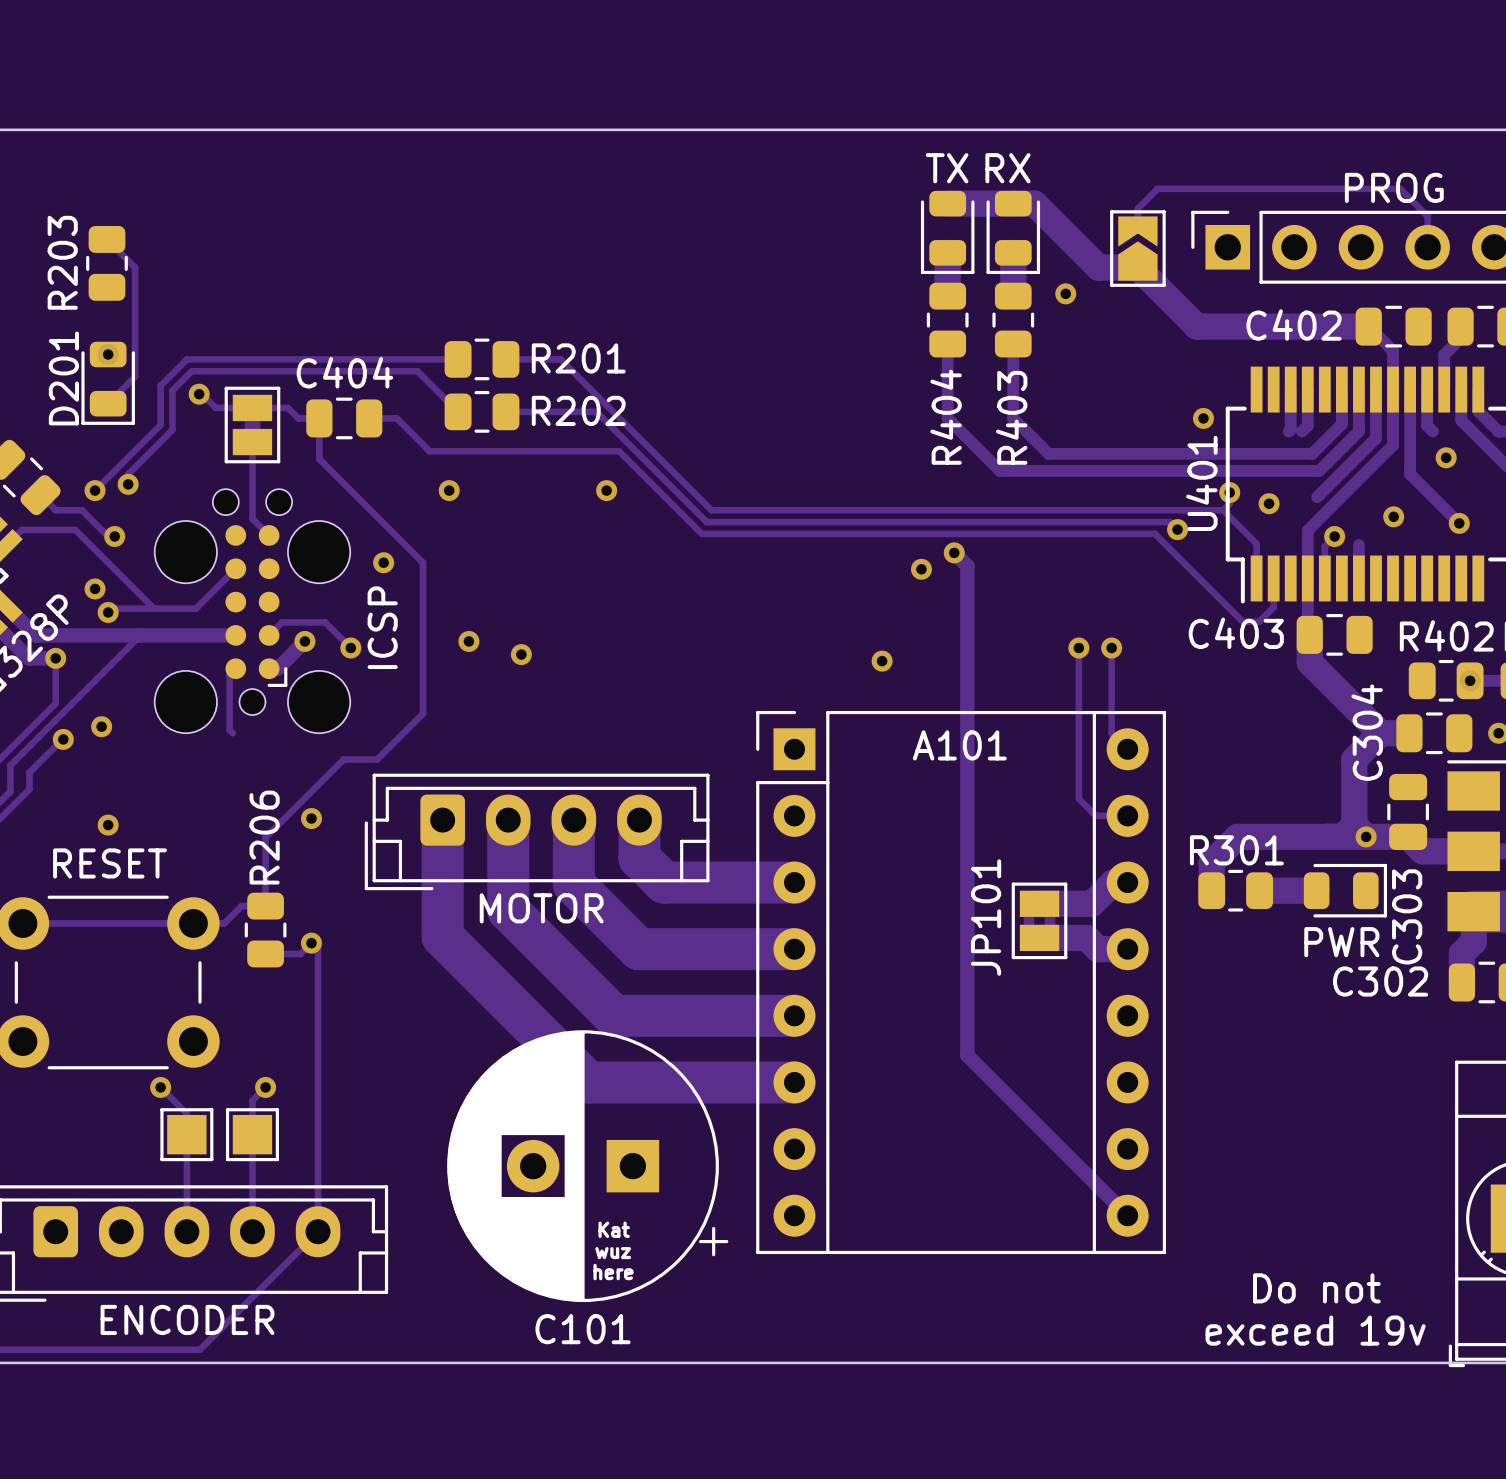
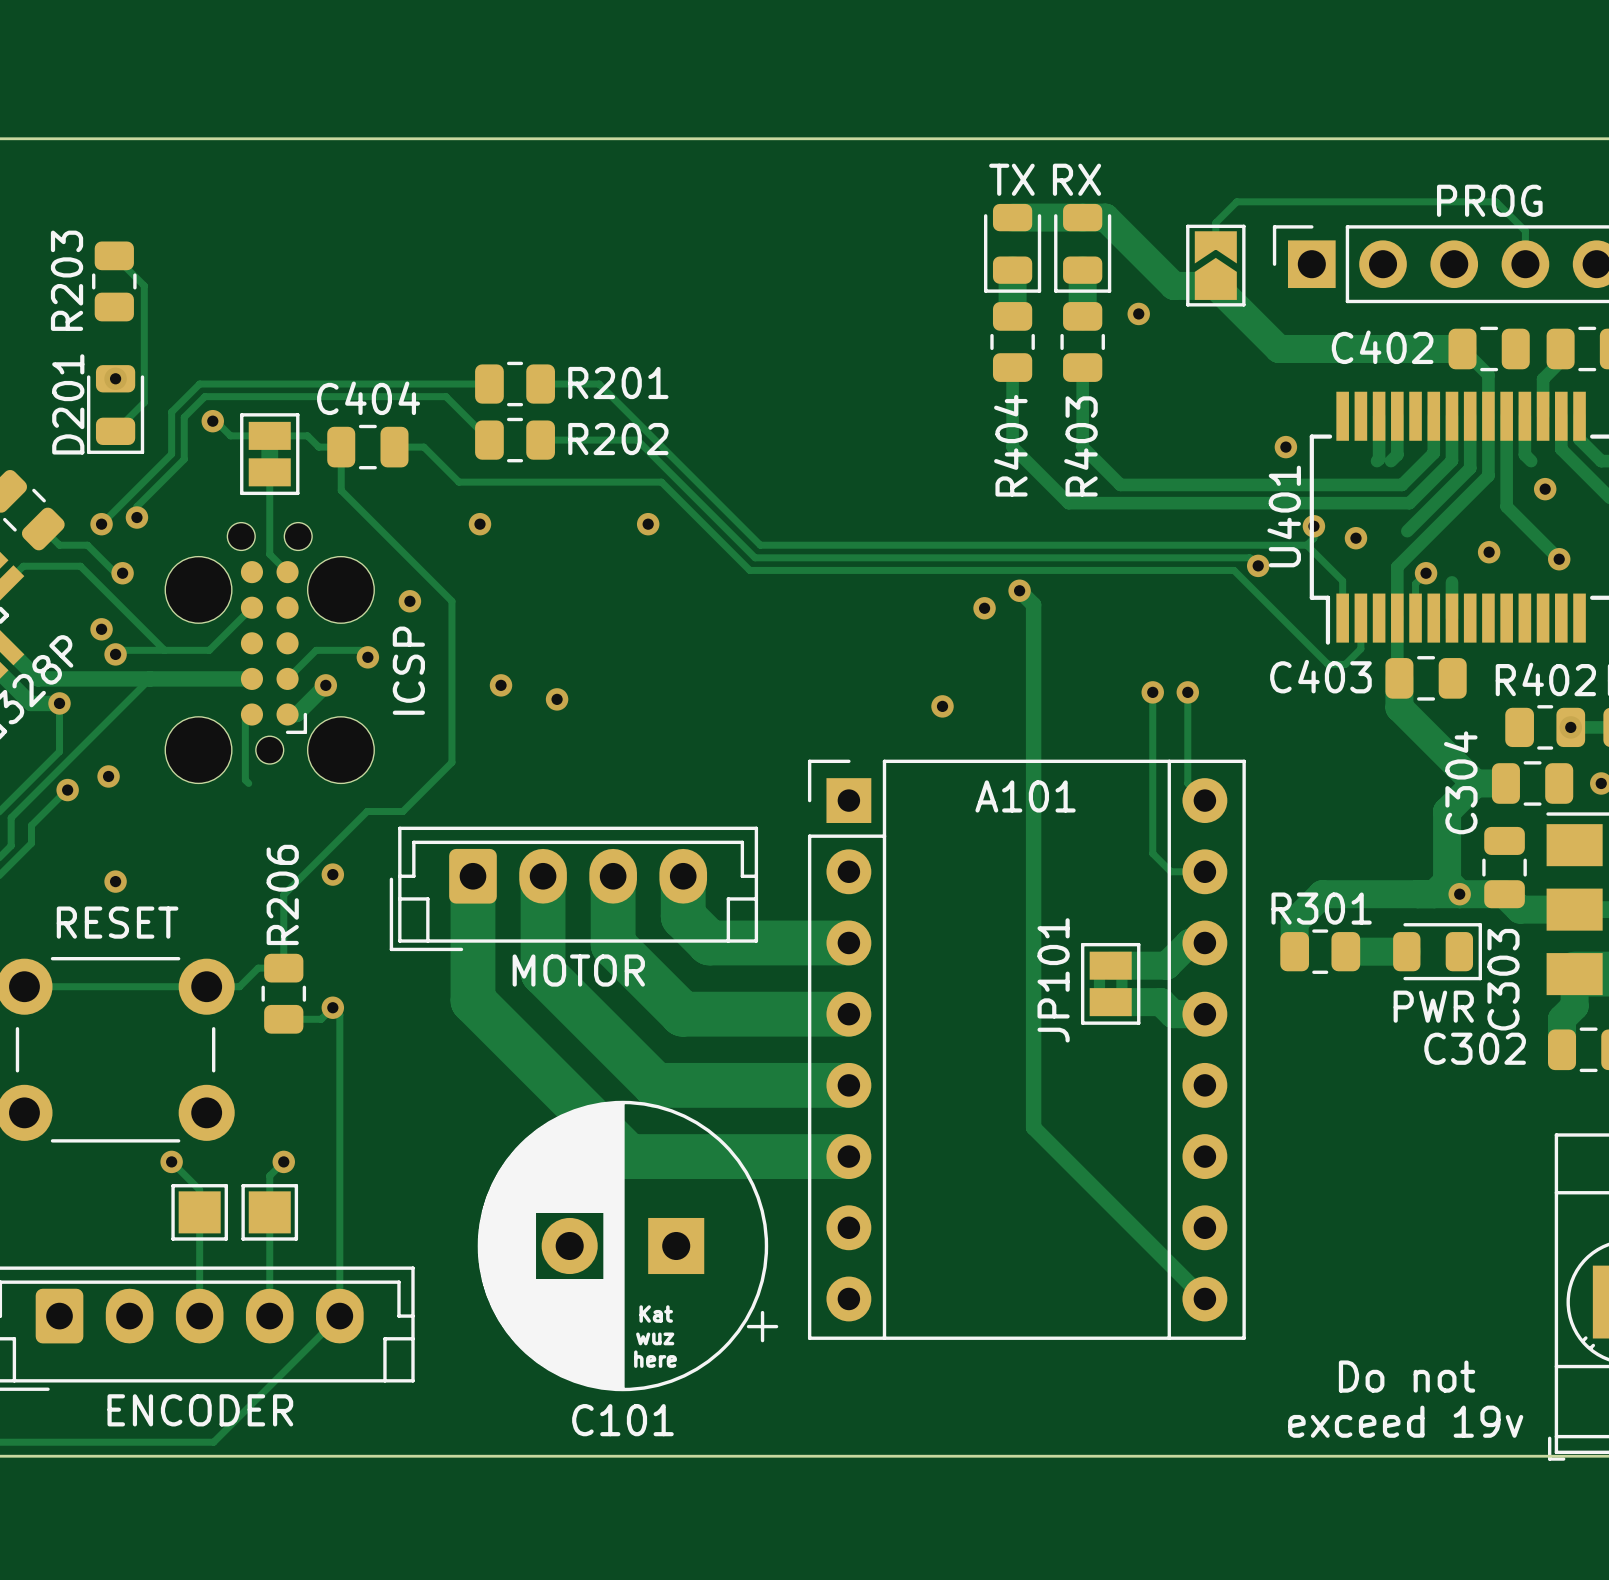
track: (282, 622) (325, 622) (350, 648) -> (301, 665) (316, 650) (360, 650) (367, 657)
via position: (350, 648) -> (367, 657)

